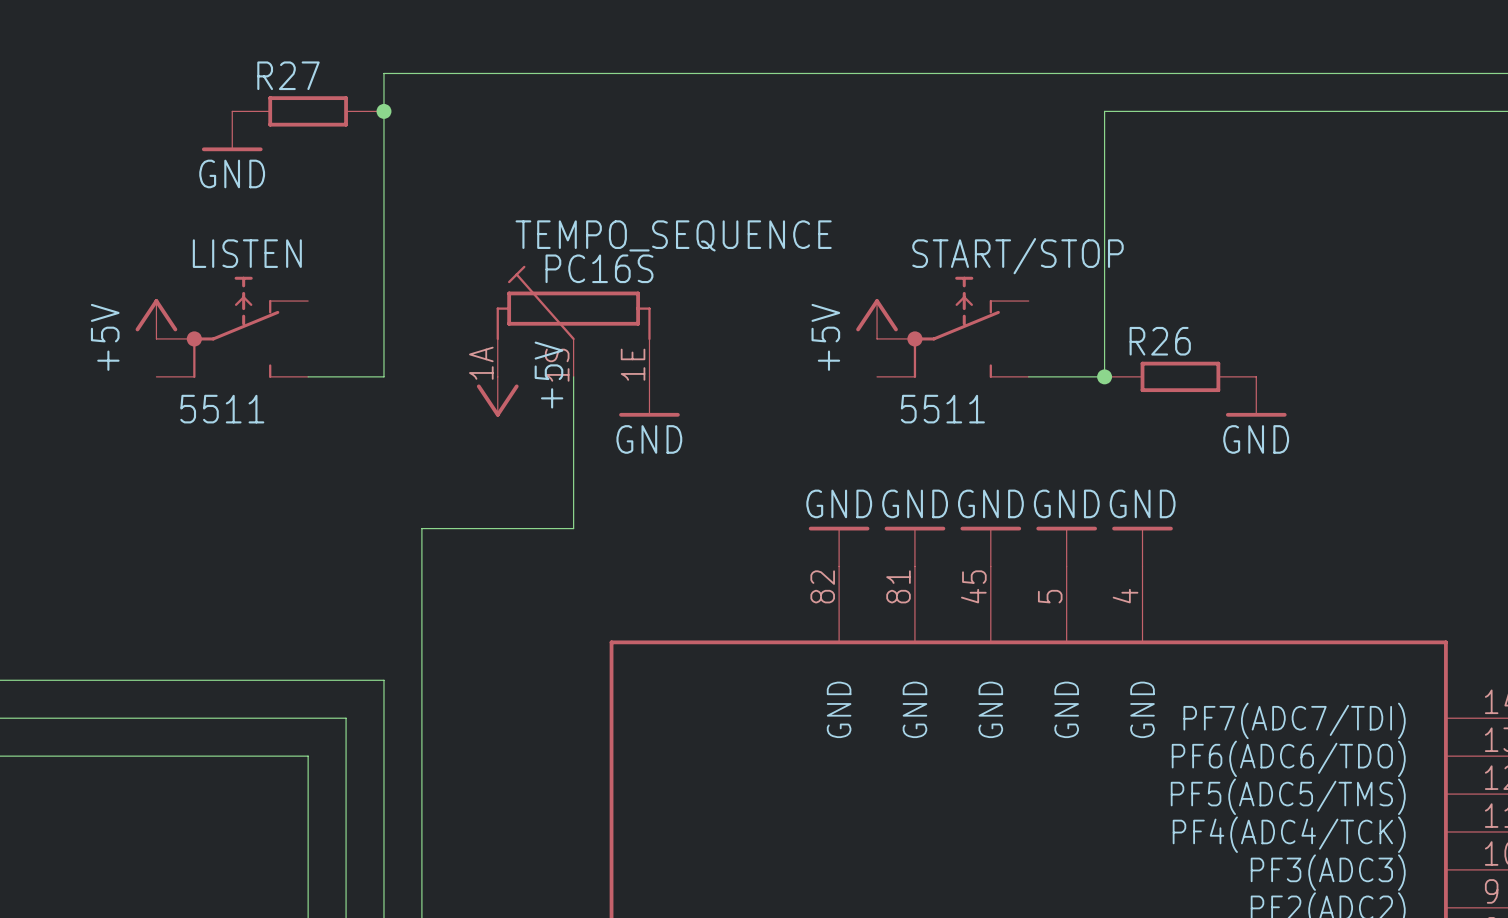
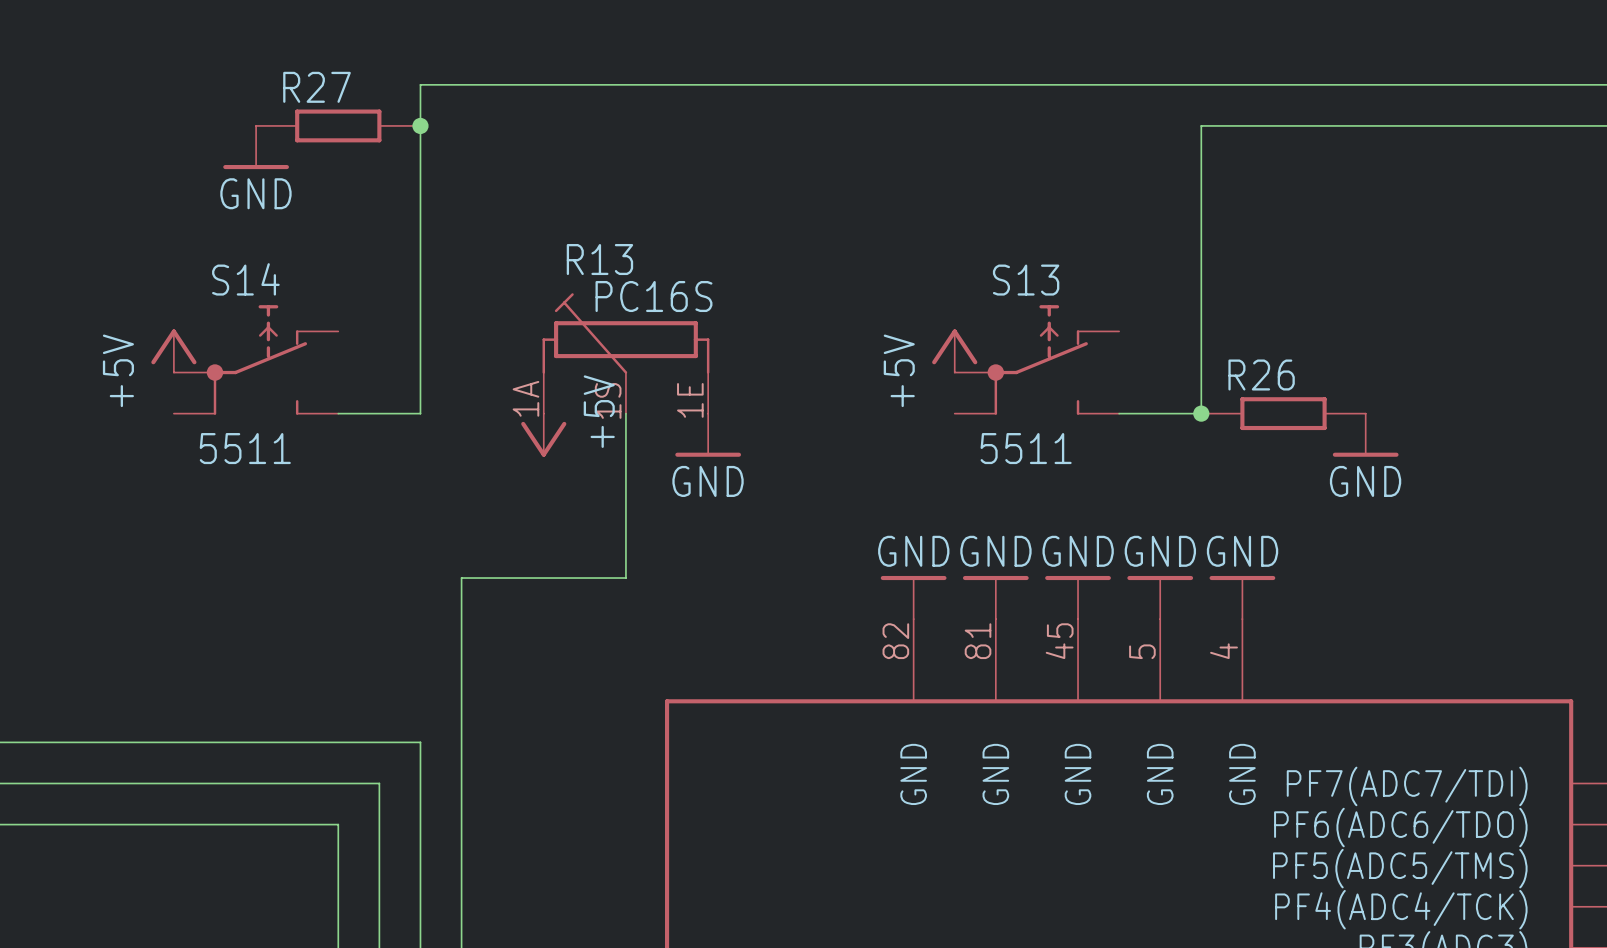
TEMPO_SEQUENCE name: TEMPO_SEQUENCE (673, 235) -> R13 (599, 259)
LISTEN name: LISTEN (247, 253) -> S14 (245, 279)
START/STOP name: START/STOP (1017, 256) -> S13 (1026, 280)

